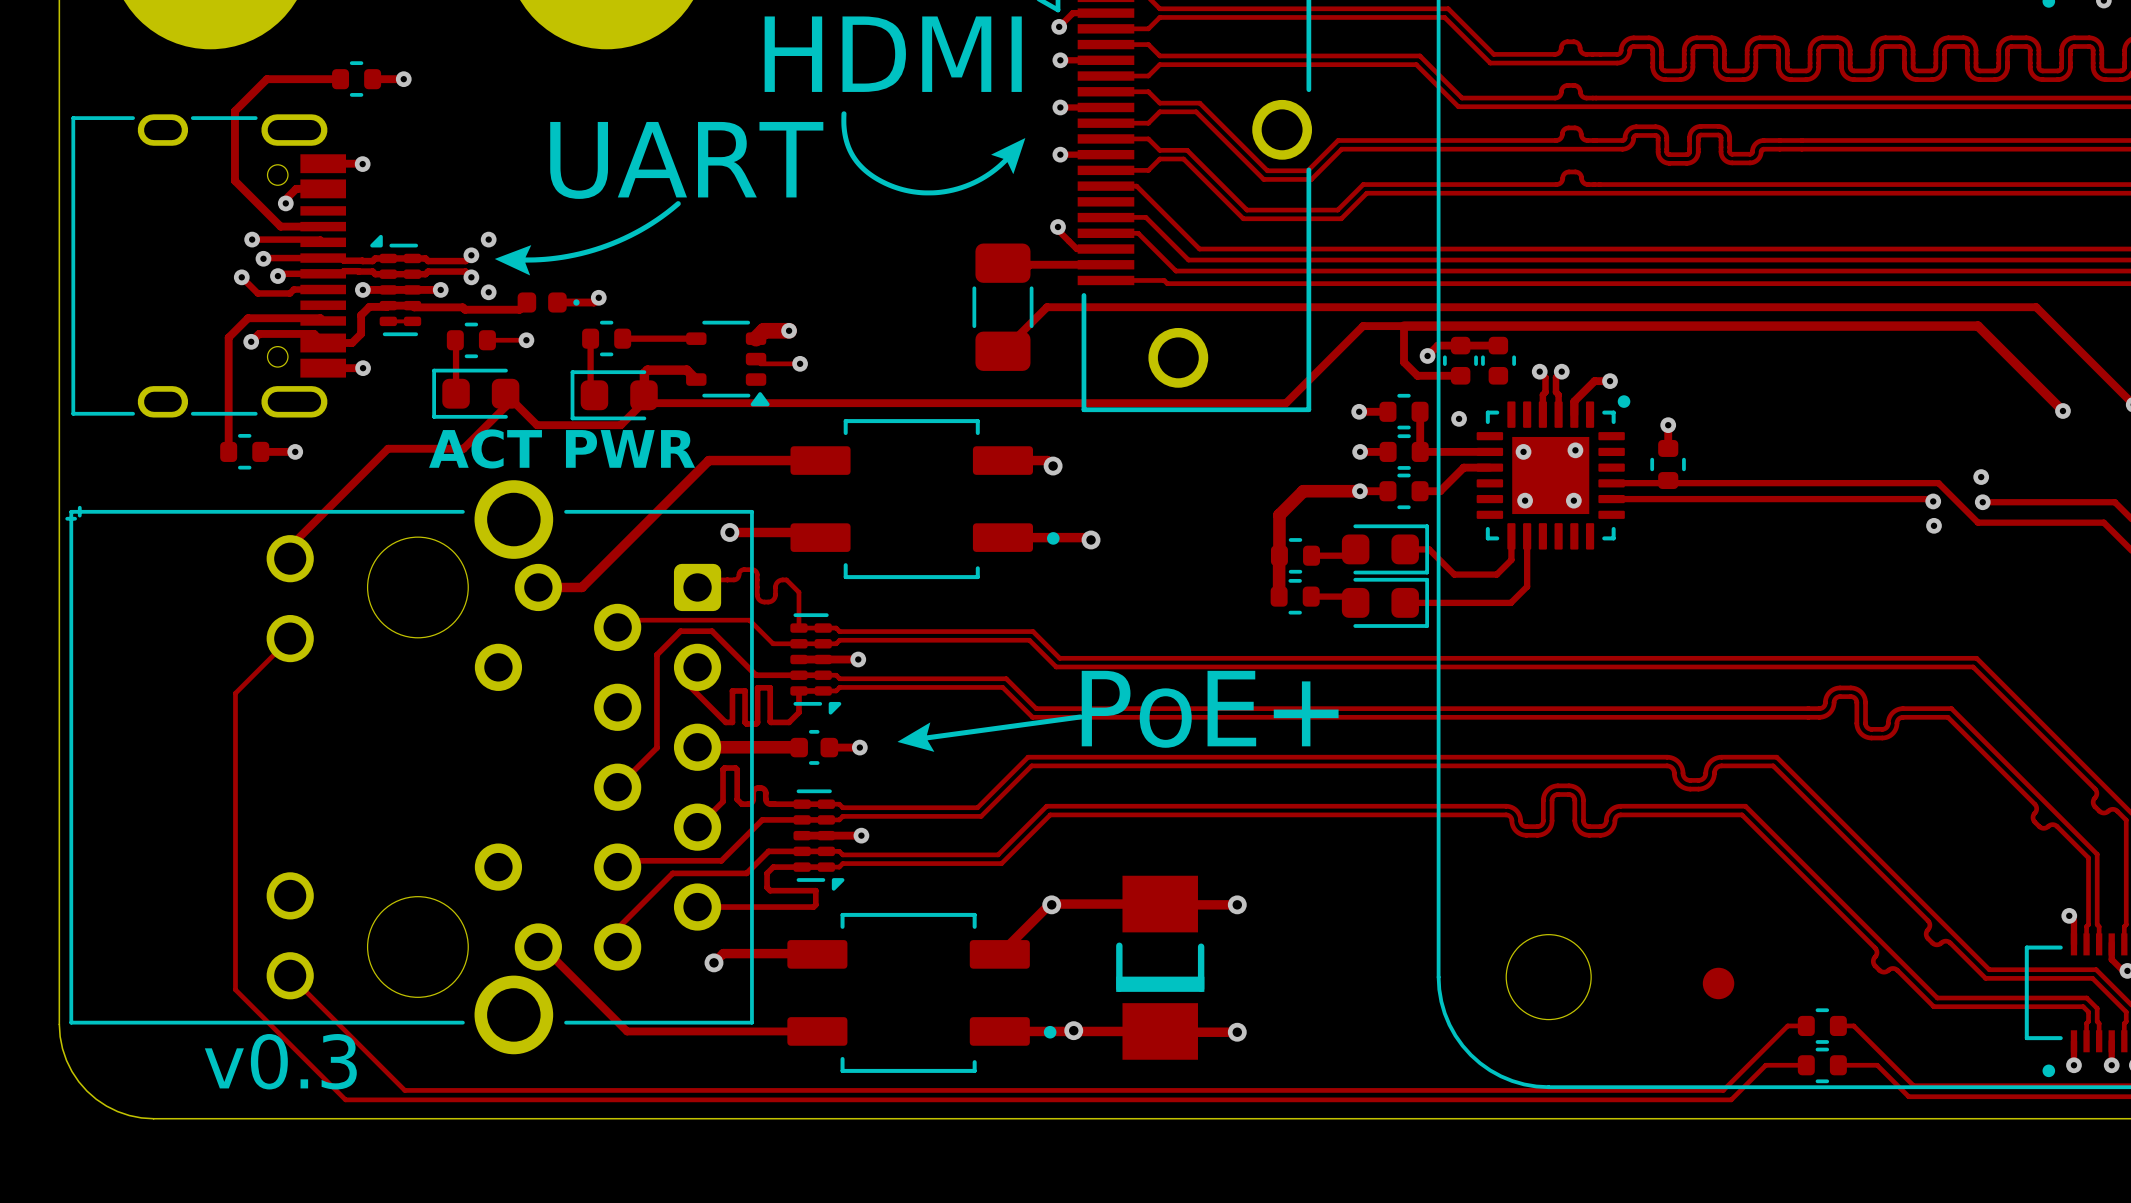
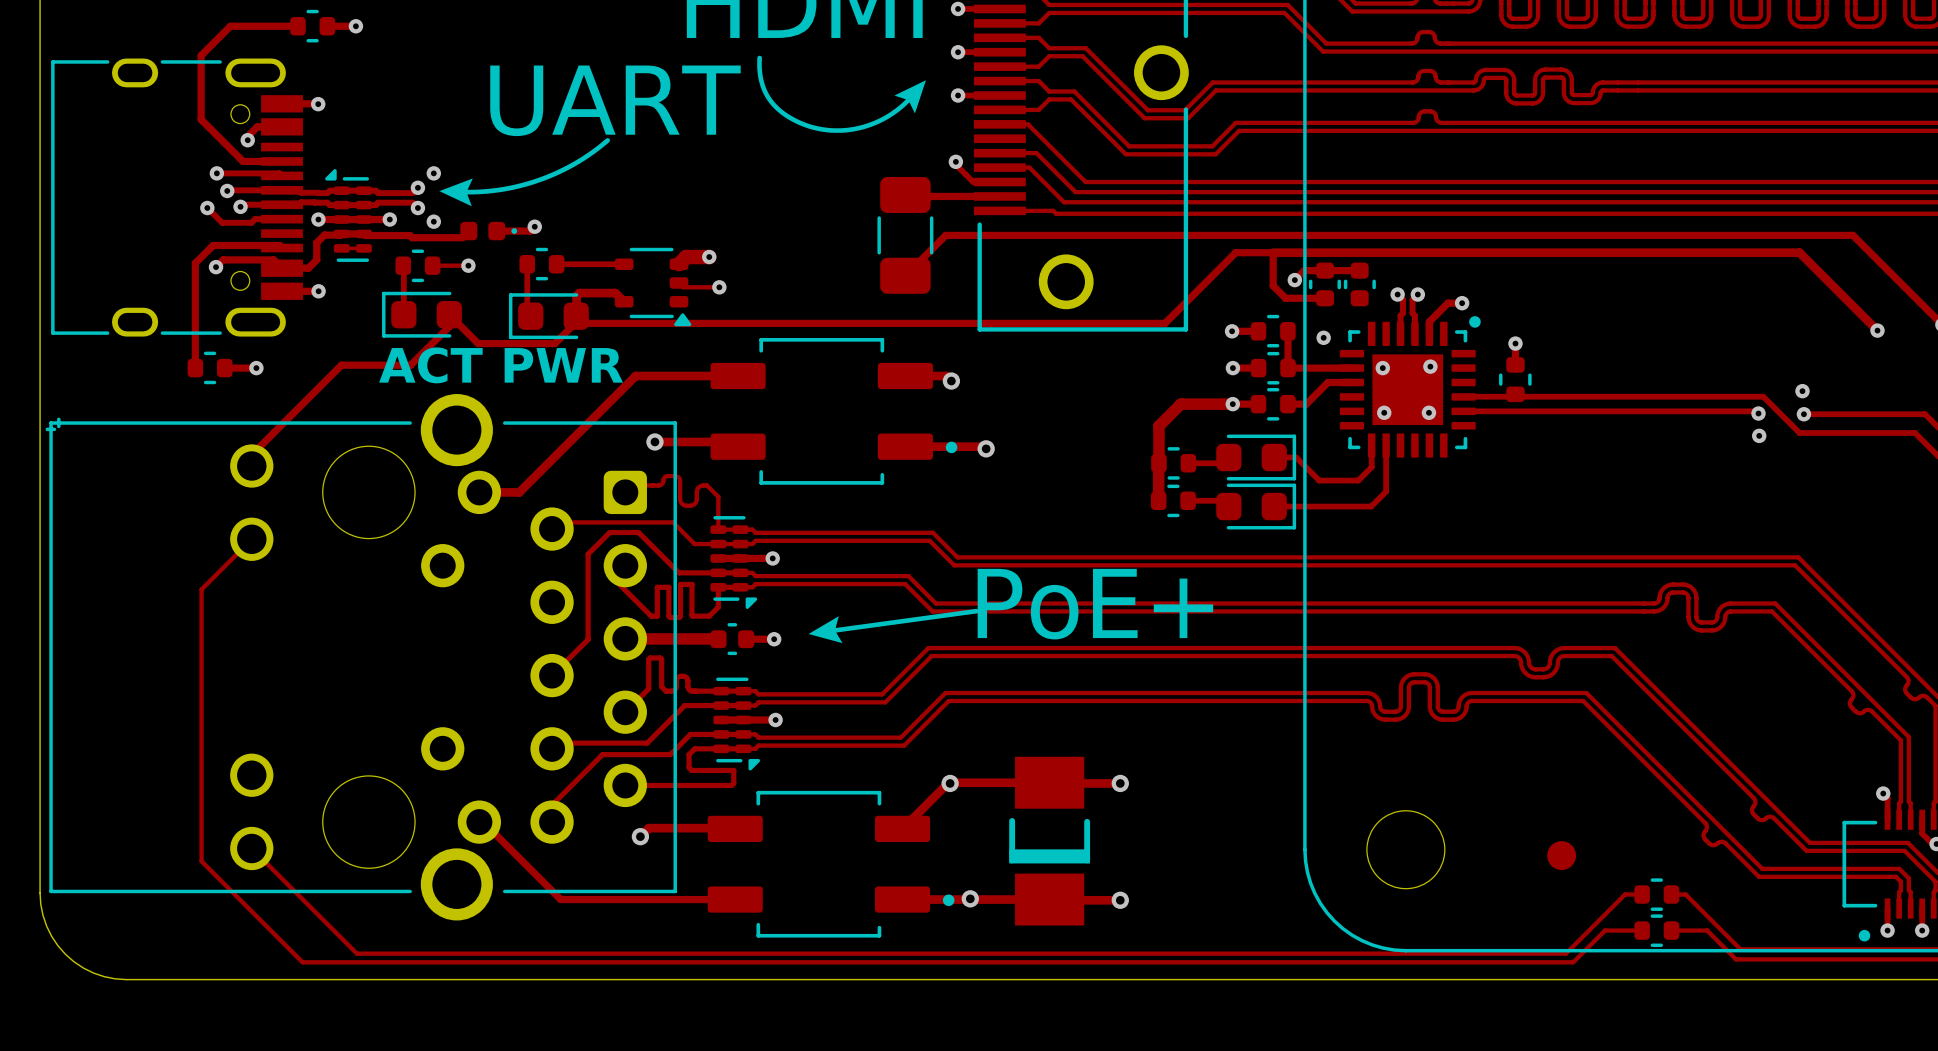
text: v0.3 (280, 1061) -> none

